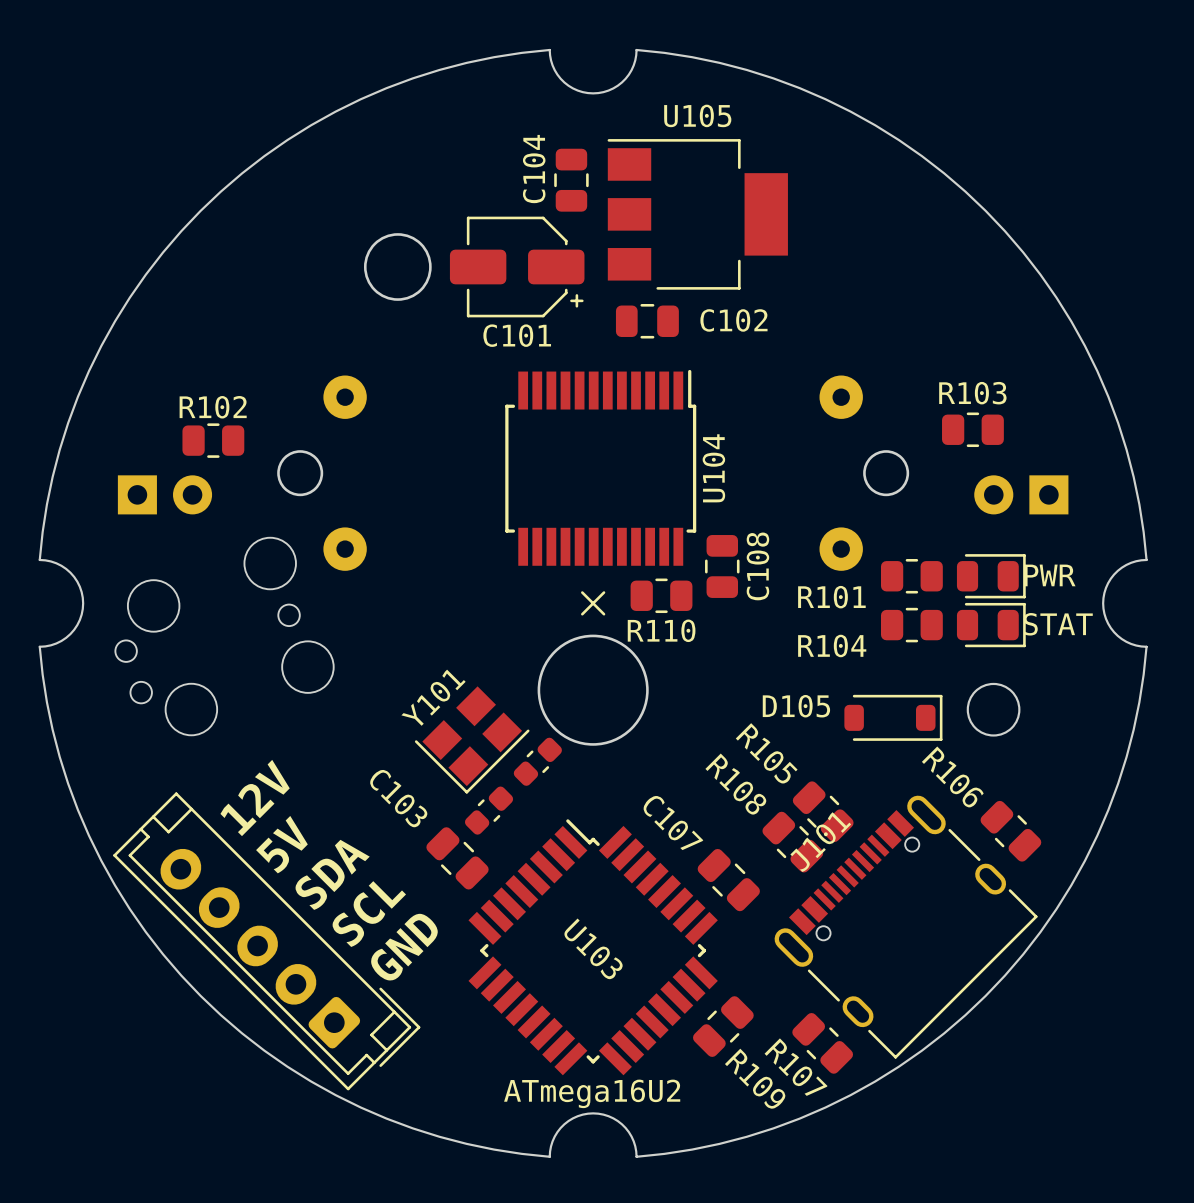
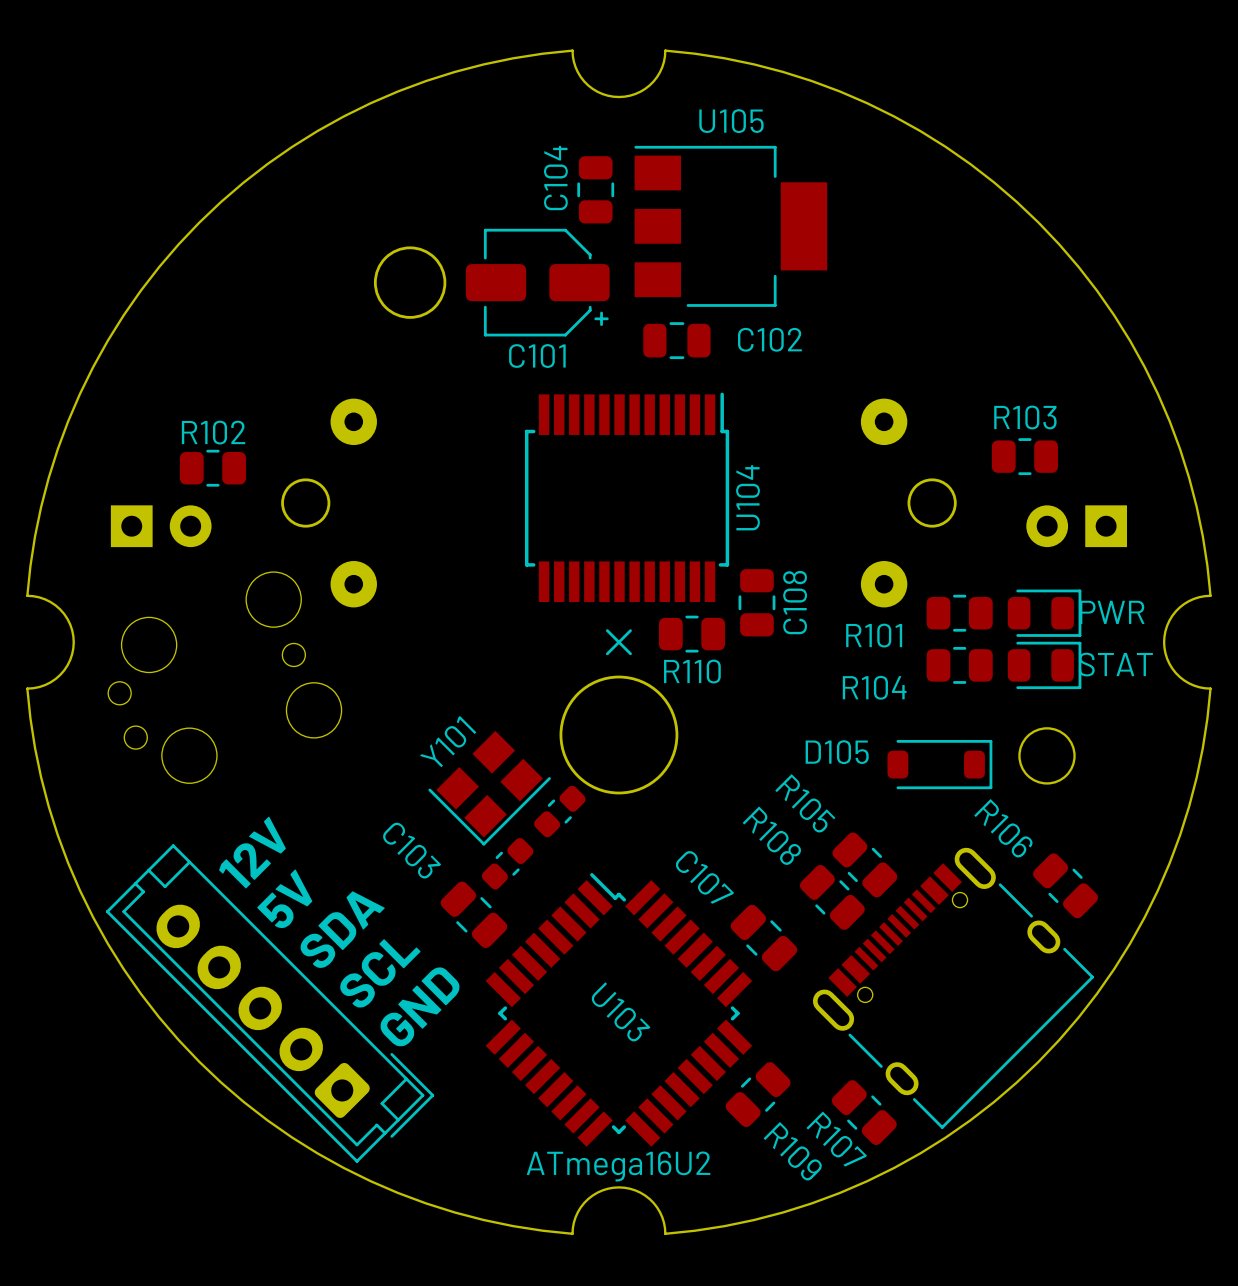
J101: (906, 927) -> none

